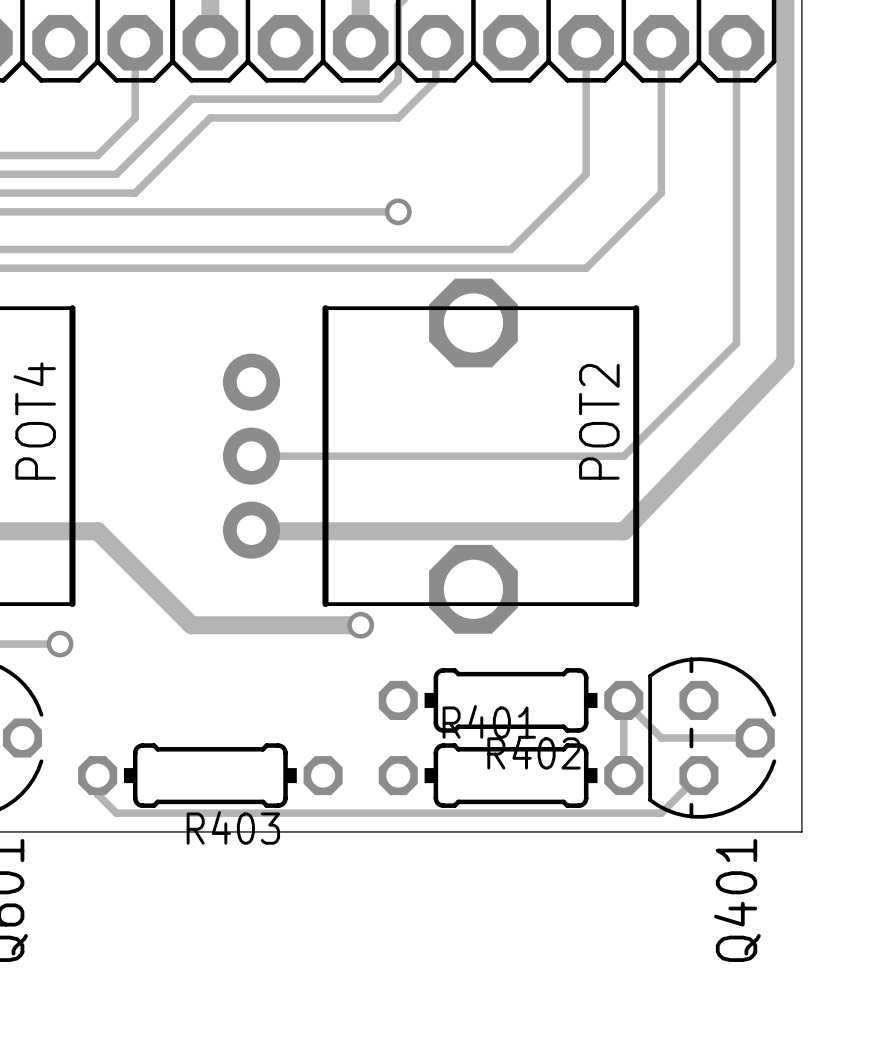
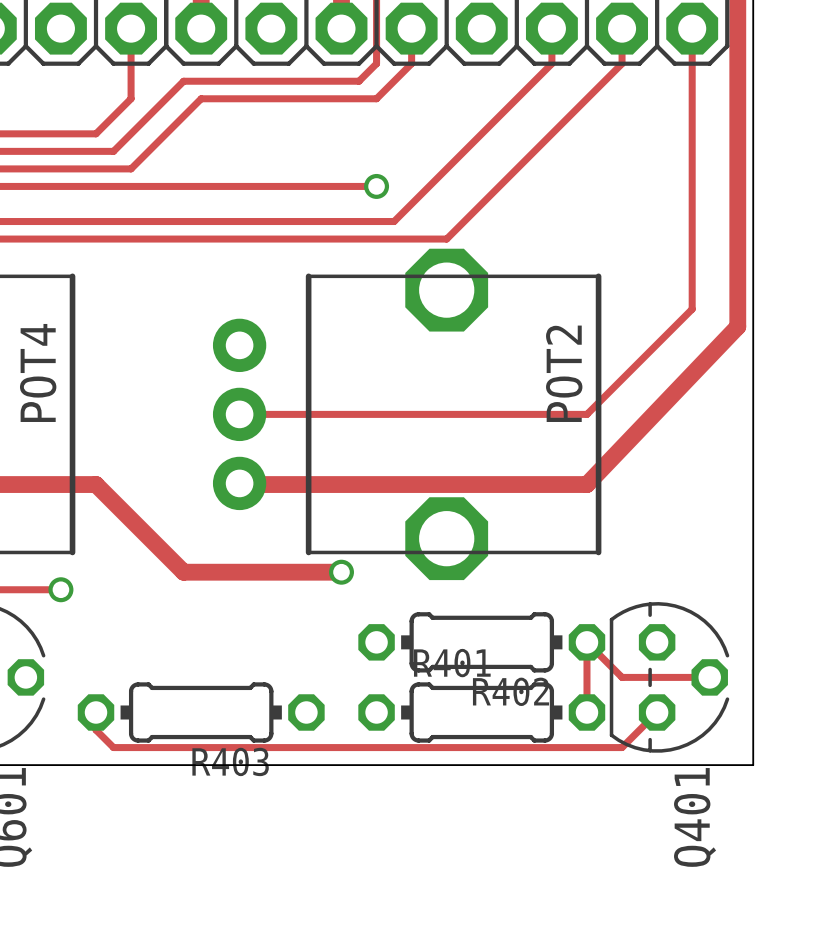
track: (586, 80) (586, 174) (511, 249) (417, 249) -> (551, 63) (394, 221)
track: (661, 80) (661, 193) (586, 268) (473, 268) -> (622, 63) (446, 239)

